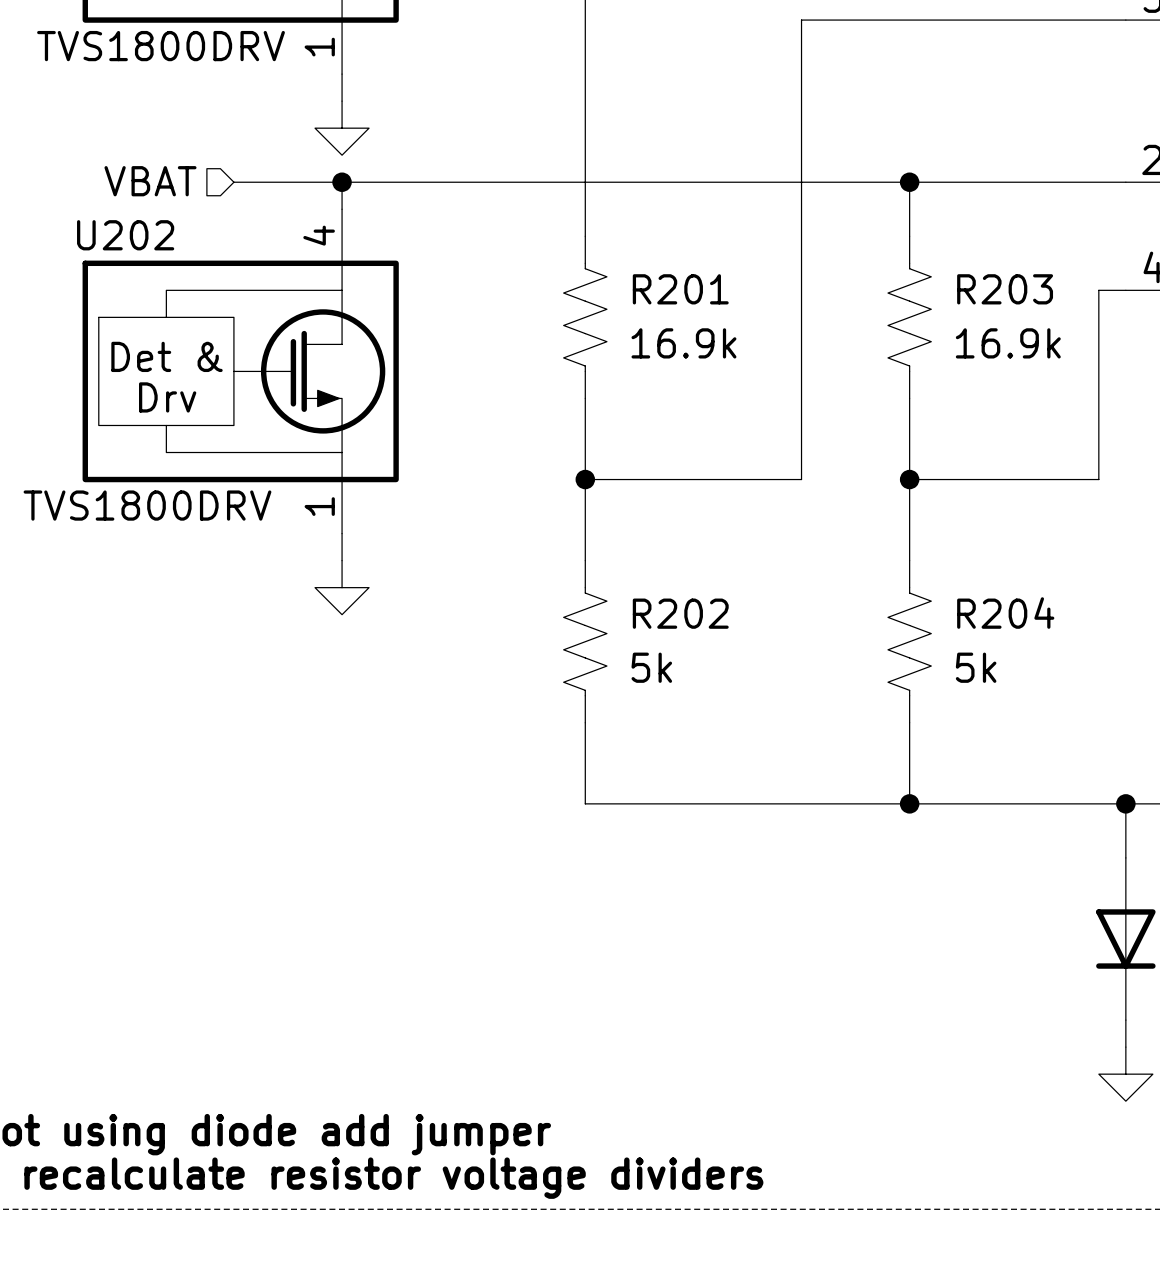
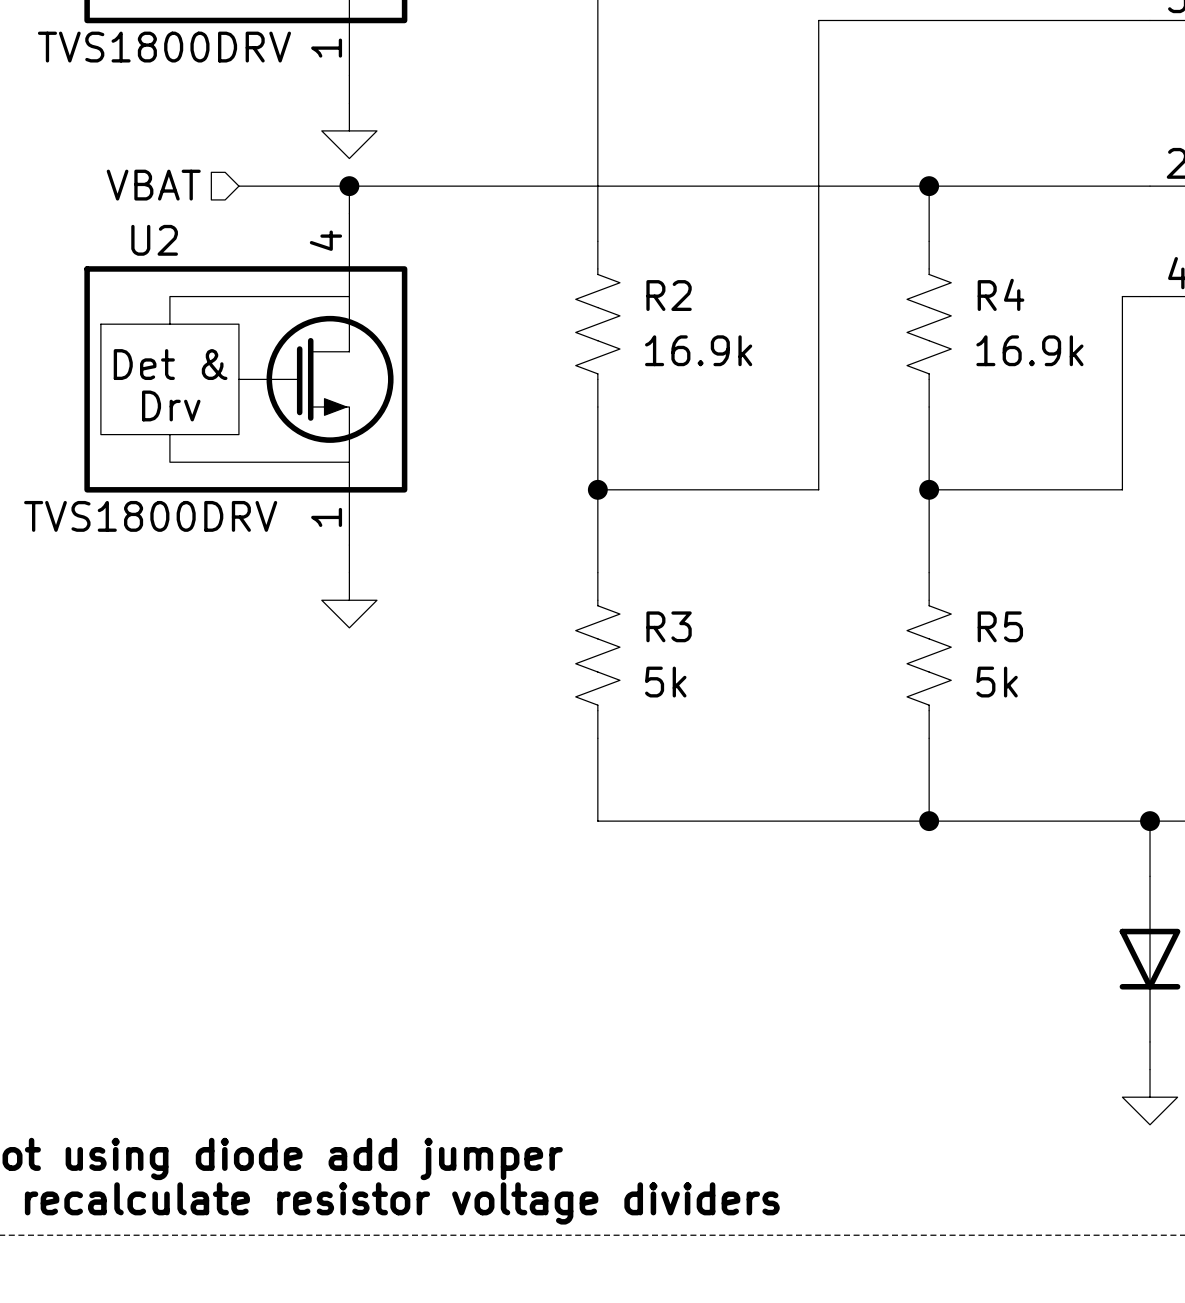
U202 name: U202 (125, 235) -> U2 (154, 240)
R201 name: R201 (680, 289) -> R2 (669, 295)
R203 name: R203 (1005, 289) -> R4 (1001, 294)
R202 name: R202 (680, 613) -> R3 (669, 626)
R204 name: R204 (1005, 613) -> R5 (1000, 626)

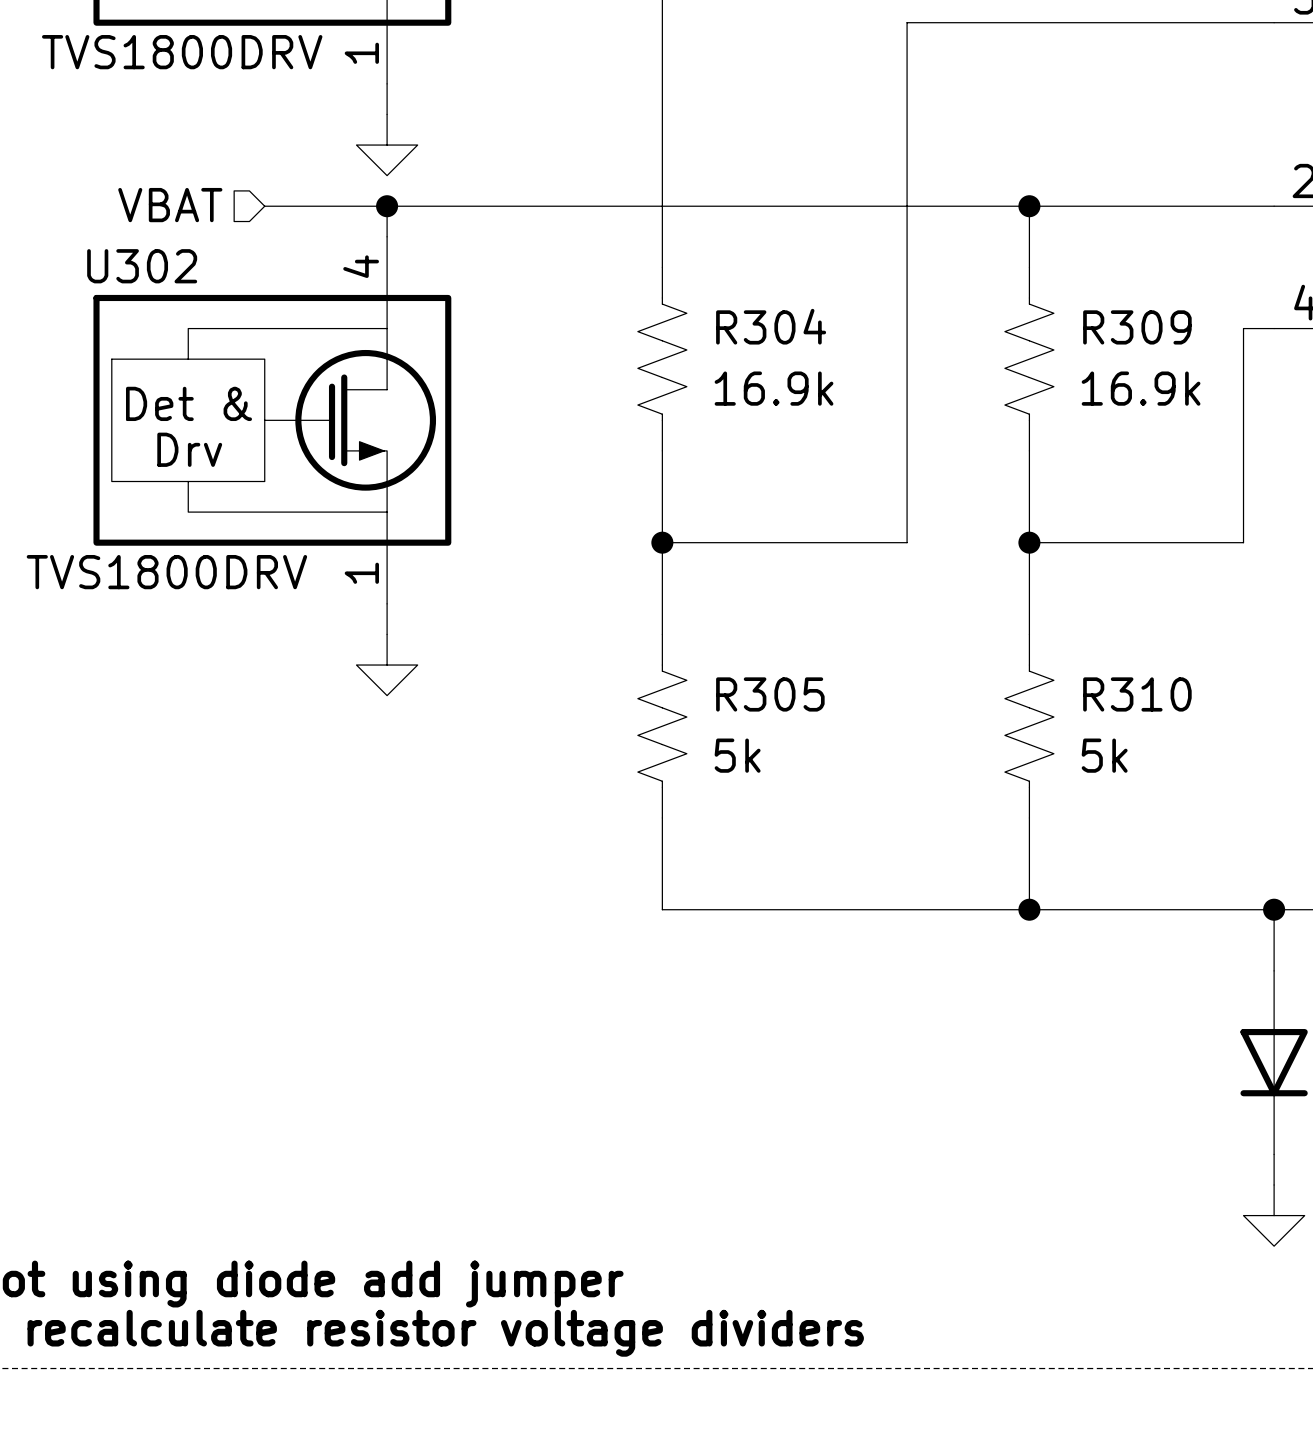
U2 name: U2 (154, 240) -> U302 (142, 266)
R4 name: R4 (1001, 294) -> R309 (1137, 327)
R2 name: R2 (669, 295) -> R304 (771, 326)
R3 name: R3 (669, 626) -> R305 (770, 694)
R5 name: R5 (1000, 626) -> R310 (1137, 694)

